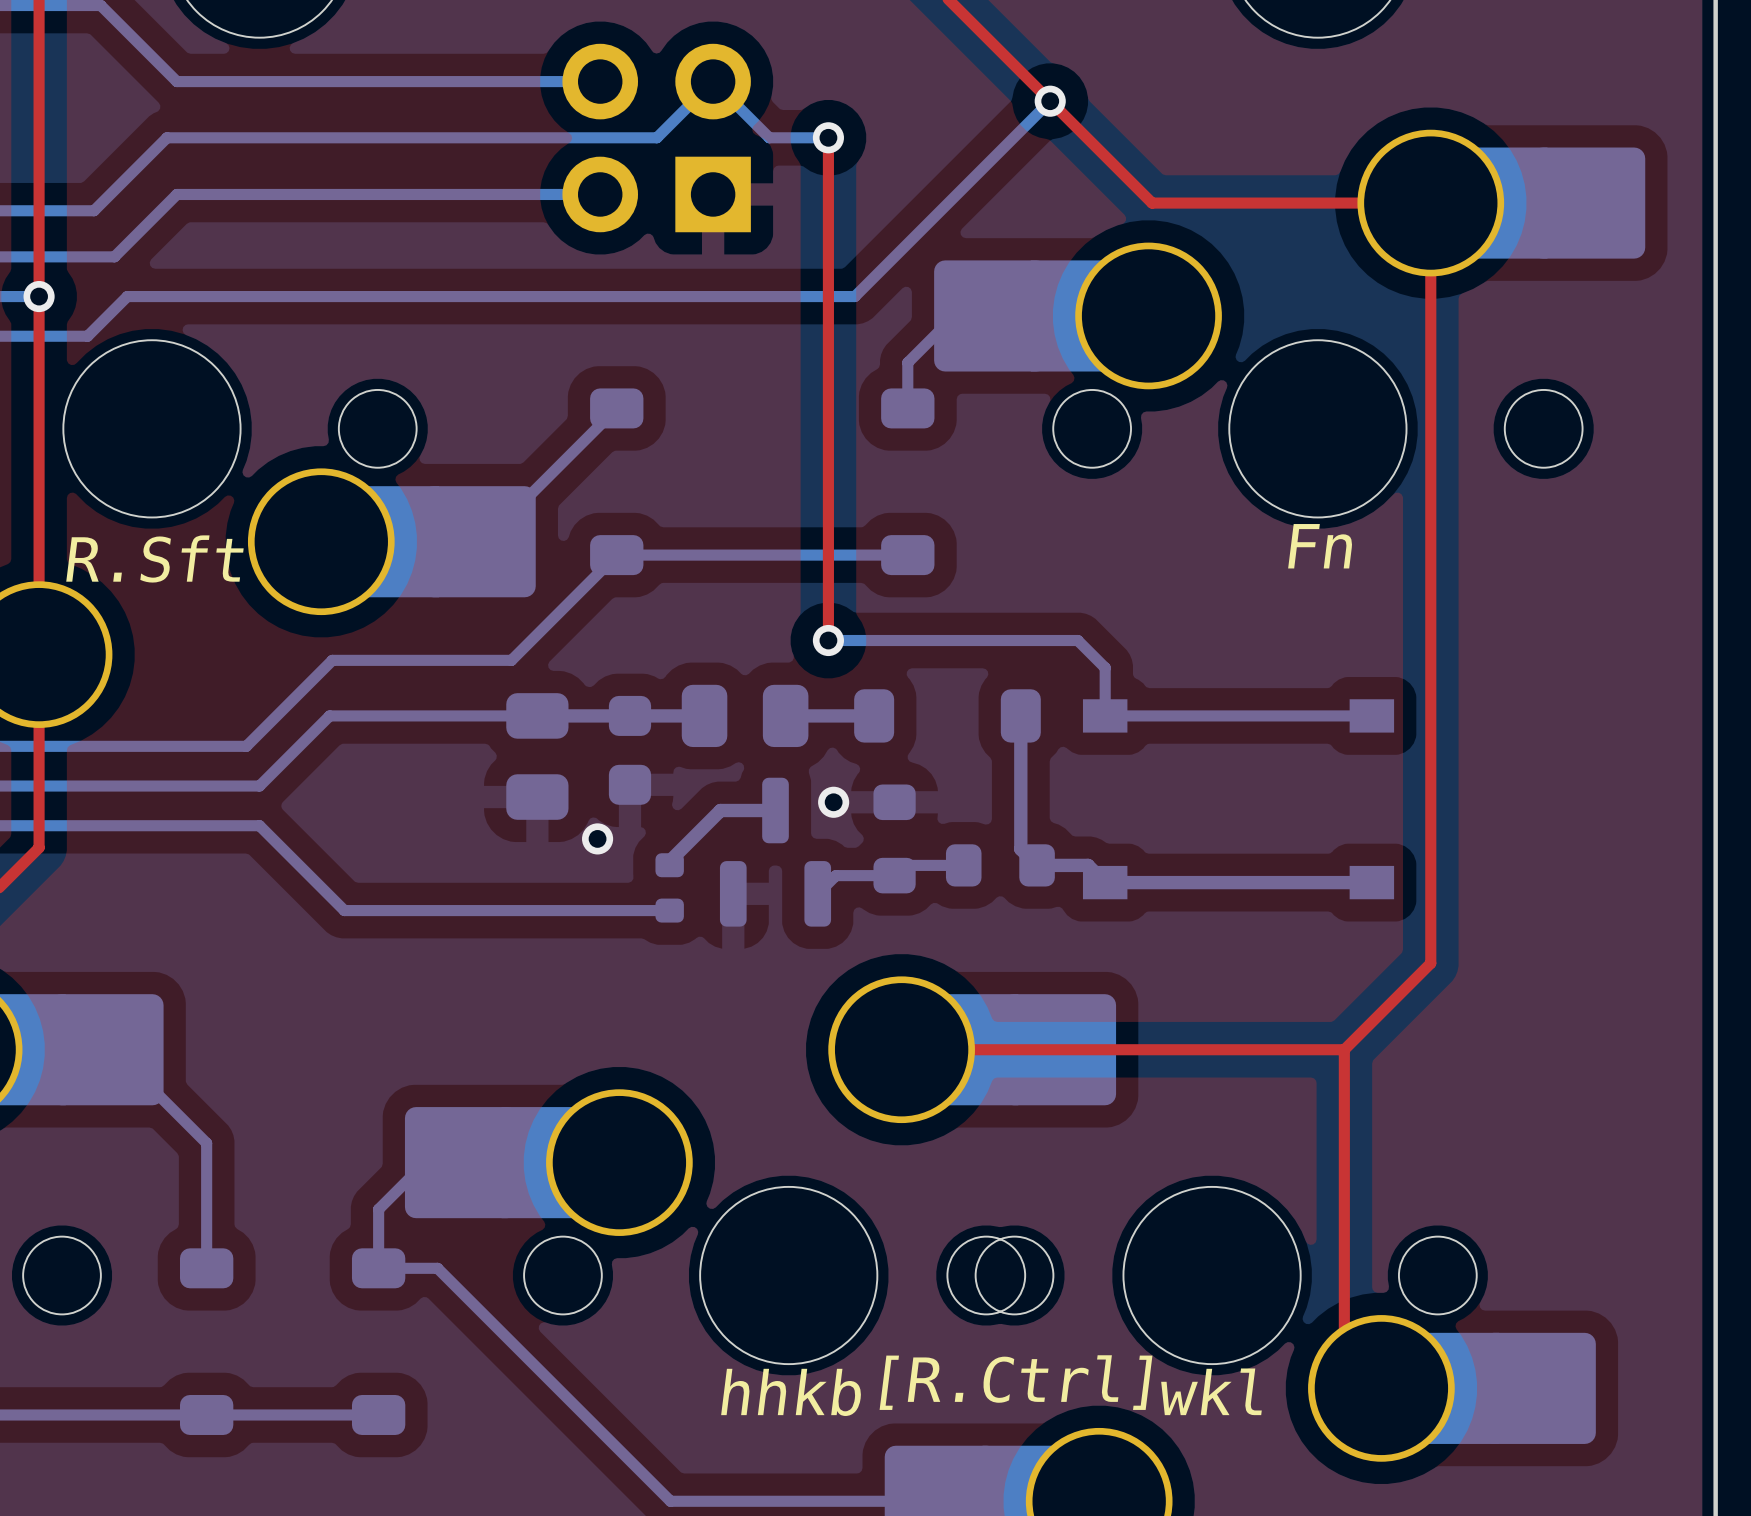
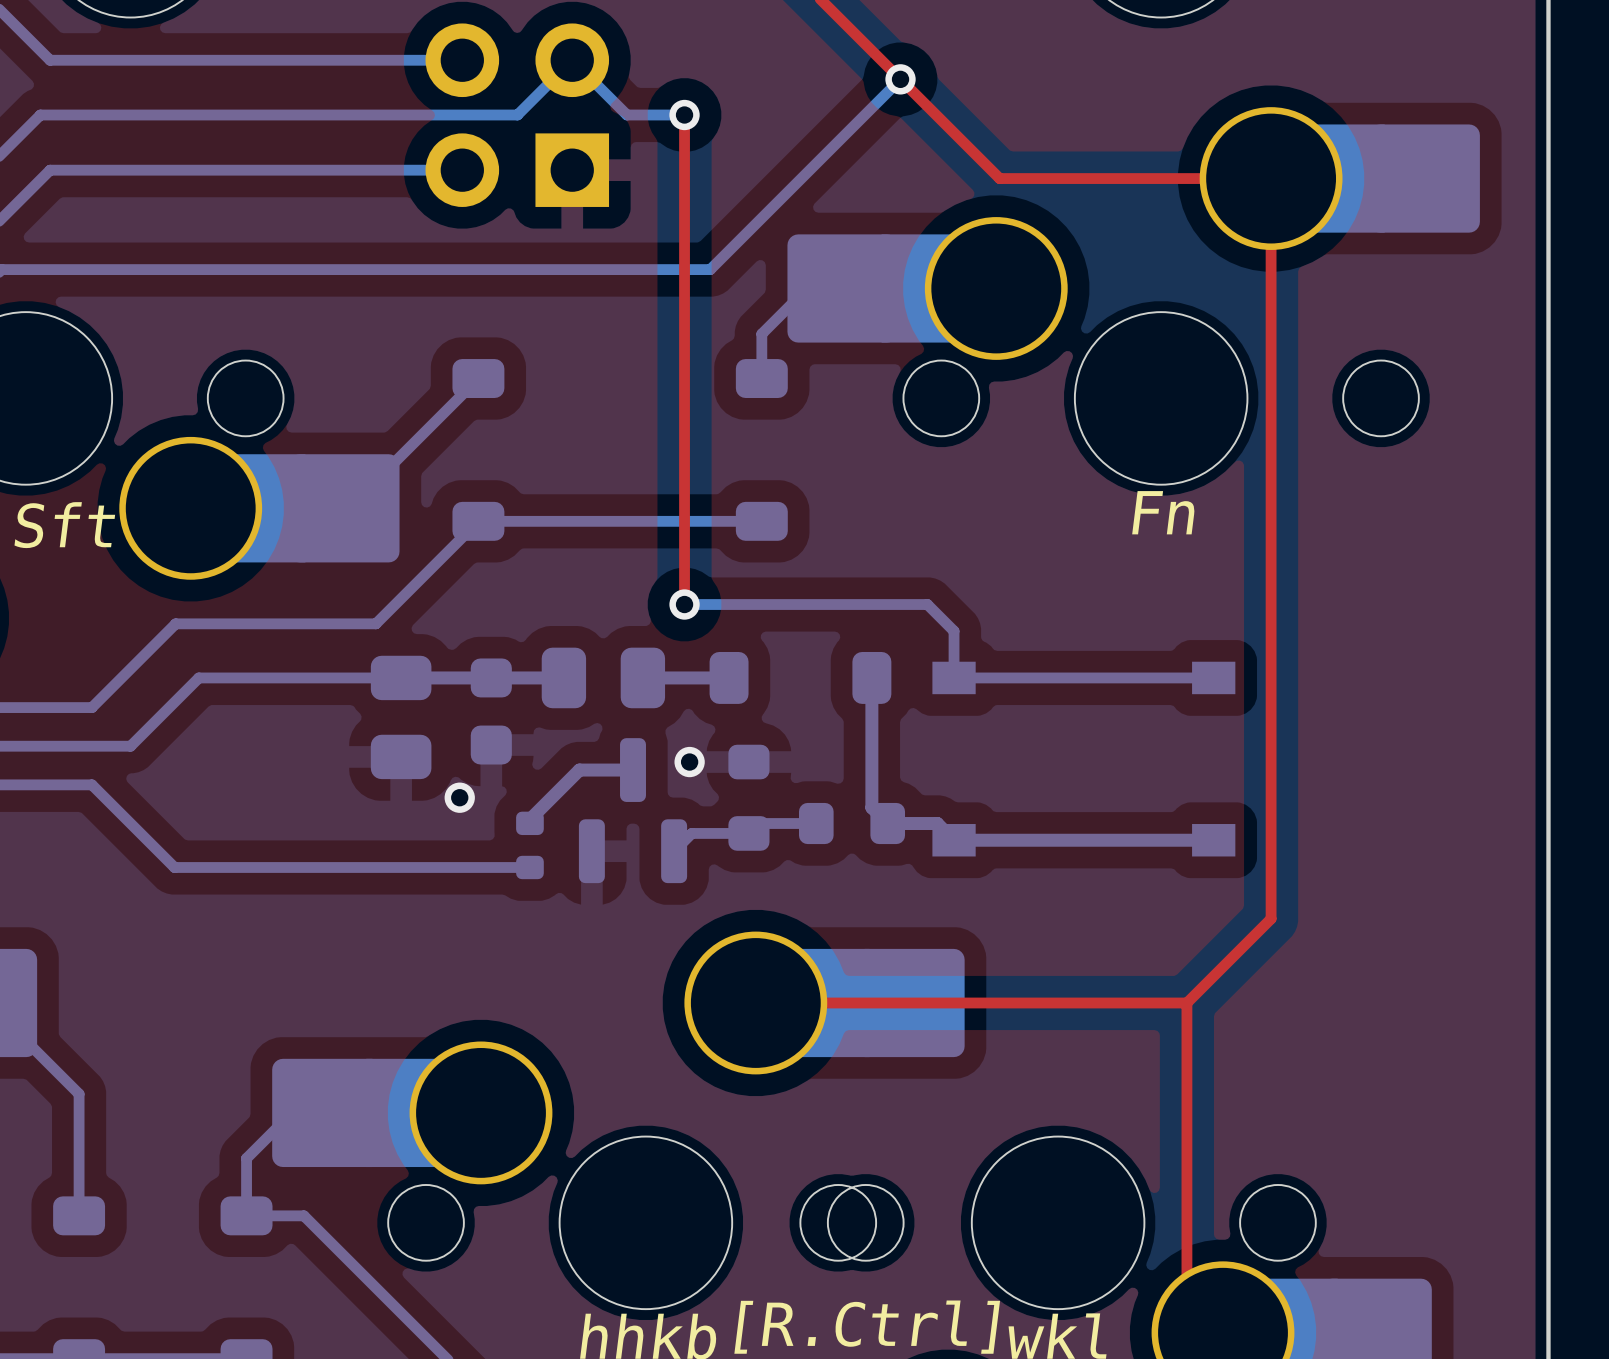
bottom track: (332, 660) (246, 746) (219, 746) -> (201, 623) (175, 623) (91, 707)
bottom track: (219, 825) (259, 825) (344, 910) -> (91, 784) (174, 867) (213, 867)

